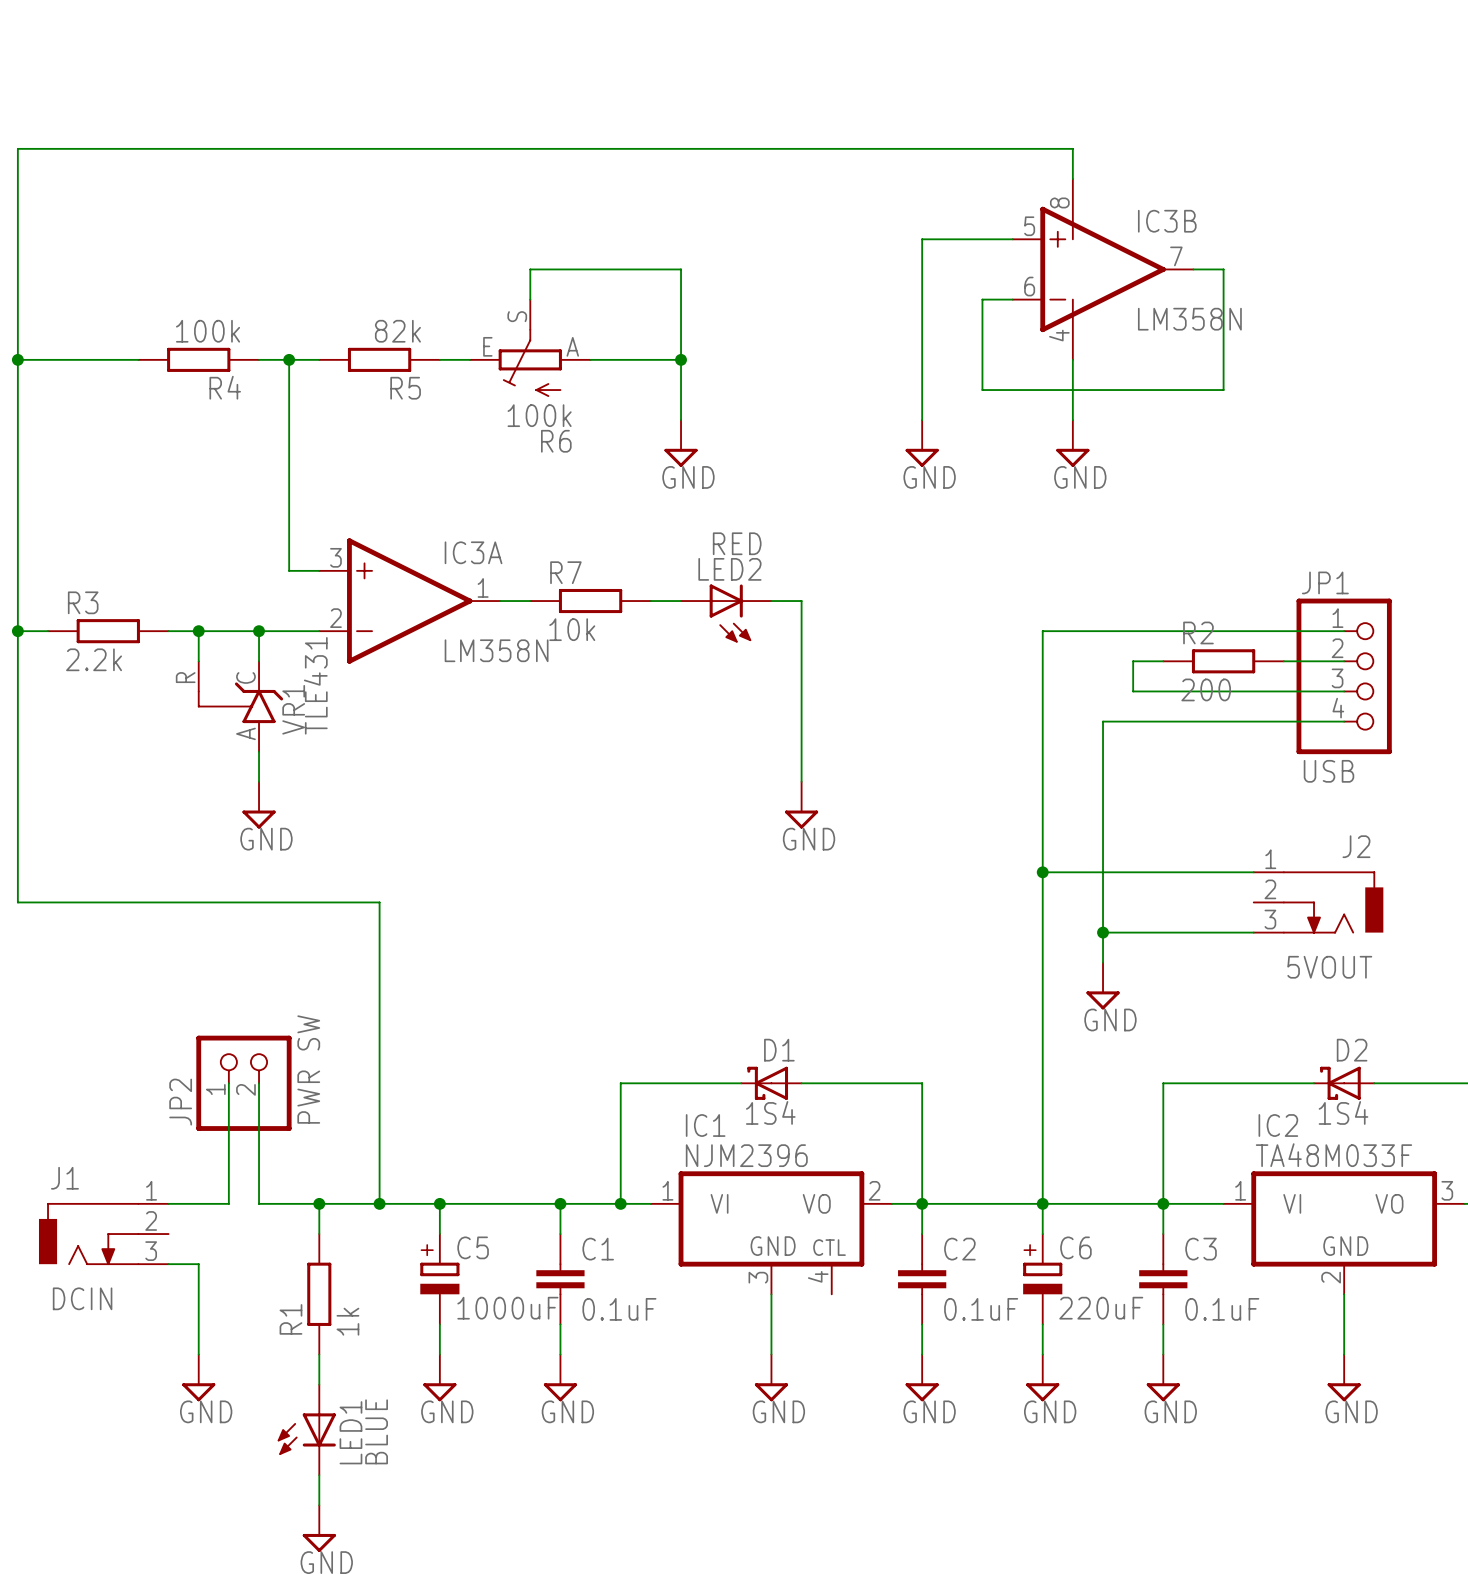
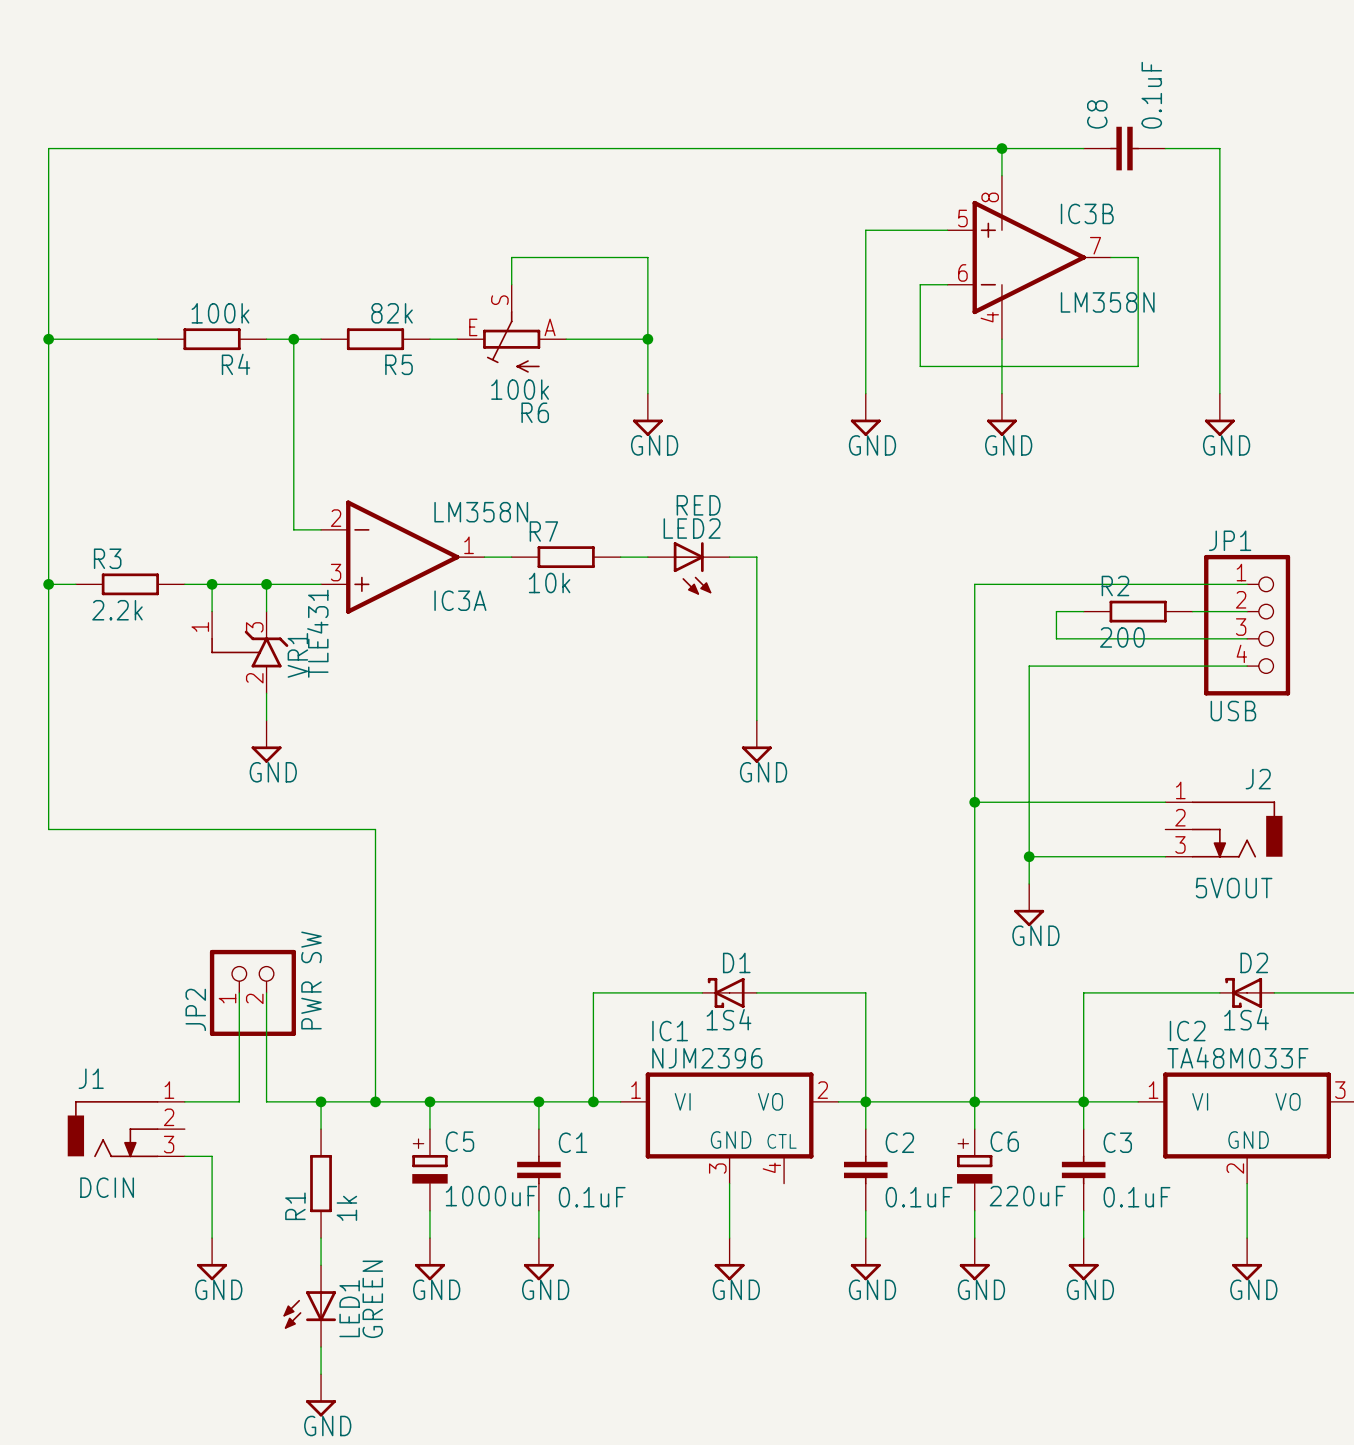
wire: none -> (1001, 148) (1083, 148)
junction: none -> (1001, 148)
C8: none -> 0.1uF (1124, 148)
wire: none -> (1165, 148) (1219, 148) (1219, 393)
power symbol: none -> GND (1219, 414)
IC3A flip: as is (409, 601) -> up-down (402, 557)
VR1 pin number: R (185, 677) -> 1 (200, 627)
VR1 pin number: C (245, 677) -> 3 (254, 627)
VR1 pin number: A (245, 733) -> 2 (254, 678)
LED1 value: BLUE (376, 1431) -> GREEN (372, 1299)

